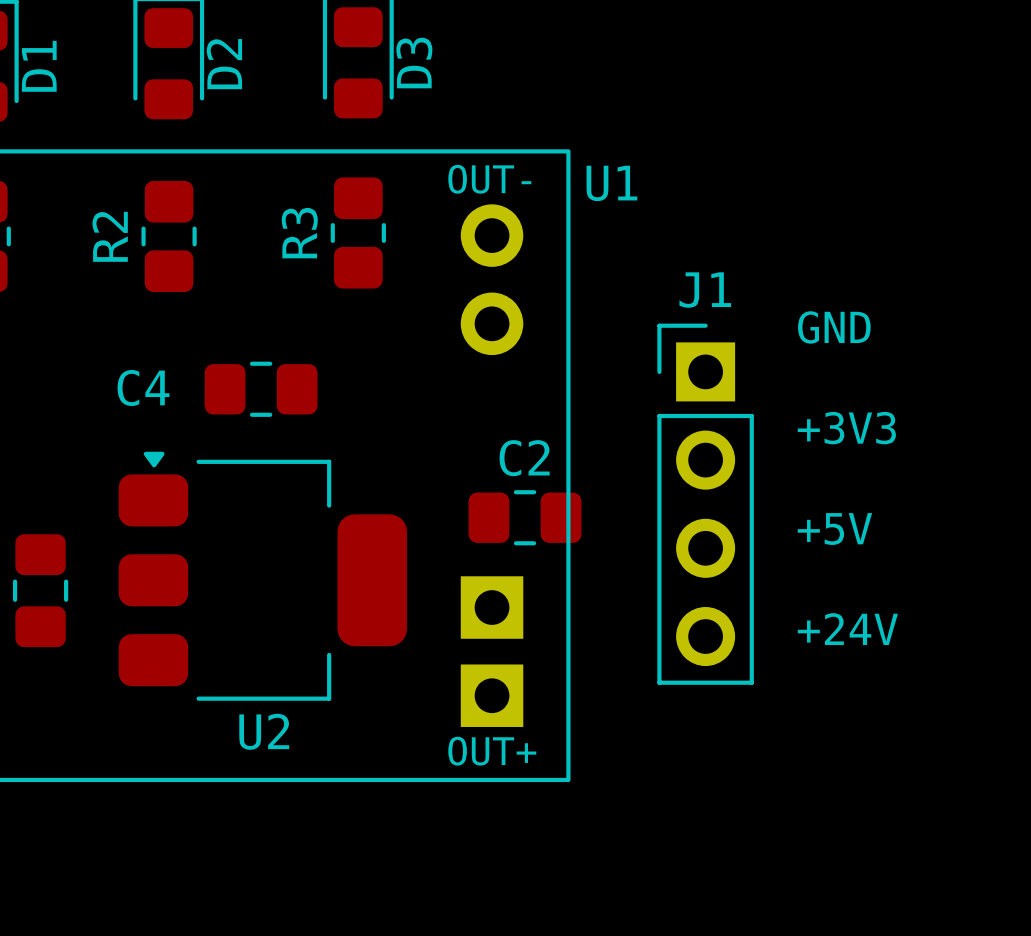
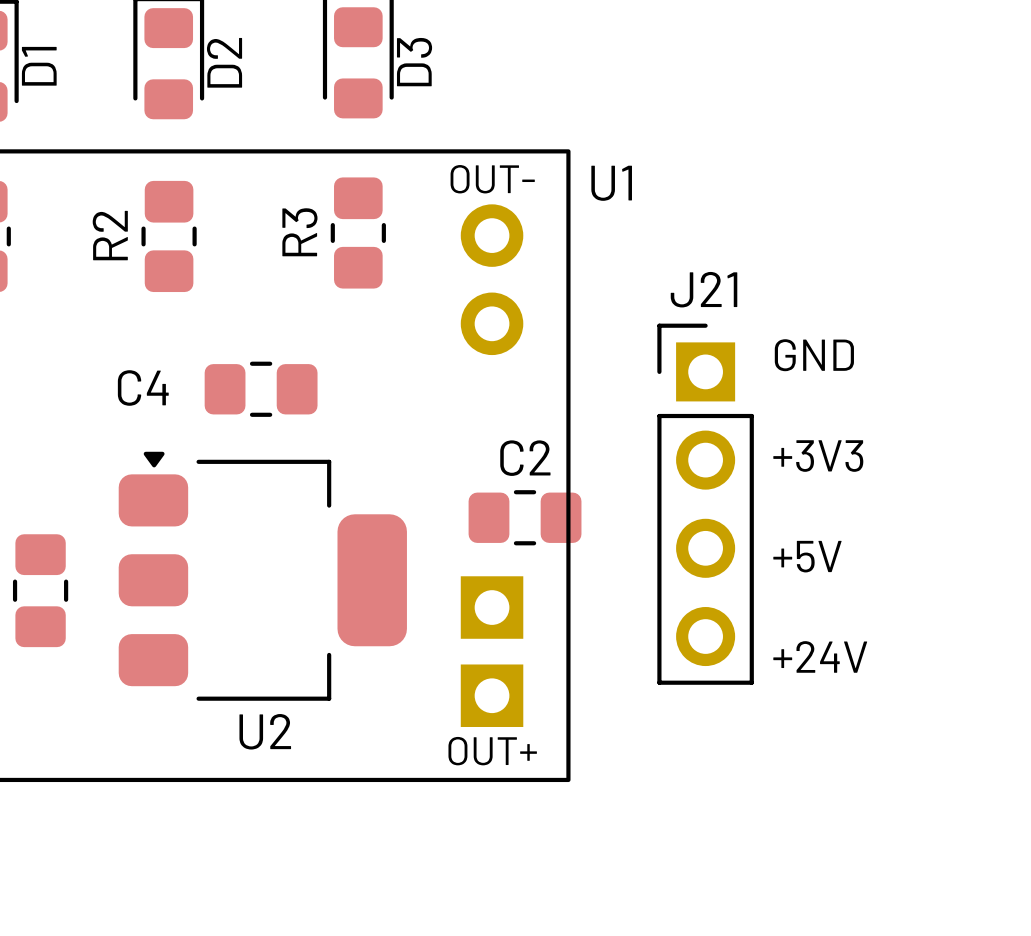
J1 name: J1 (705, 290) -> J21 (704, 289)
text position: GND (834, 327) -> GND (814, 355)
text position: +3V3 (846, 428) -> +3V3 (818, 456)
text position: +5V (834, 529) -> +5V (807, 556)
text position: +24V (847, 629) -> +24V (820, 656)

